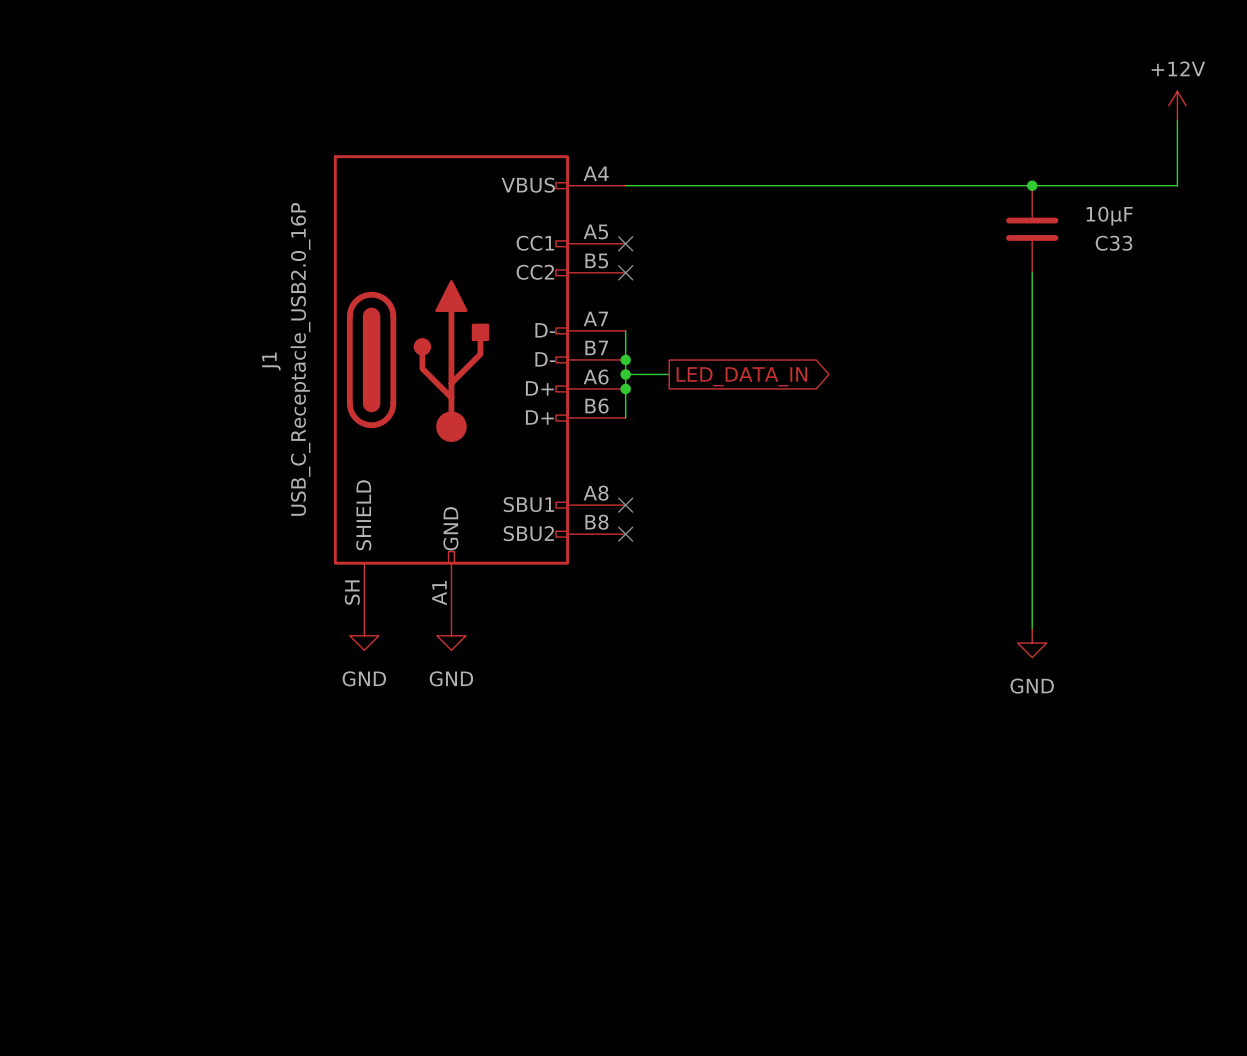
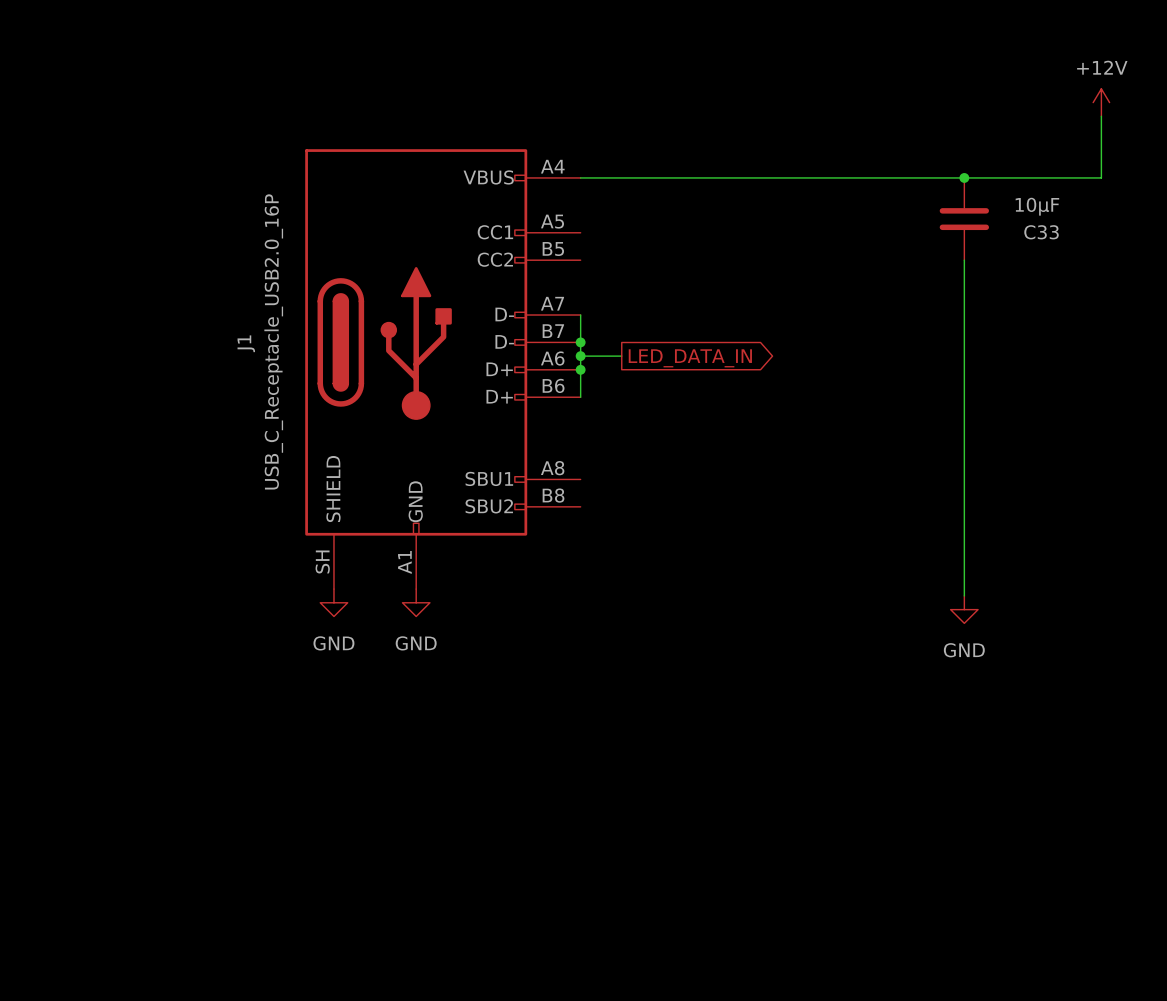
no-connect mark: (625, 243) -> none
no-connect mark: (625, 272) -> none
no-connect mark: (625, 505) -> none
no-connect mark: (625, 534) -> none

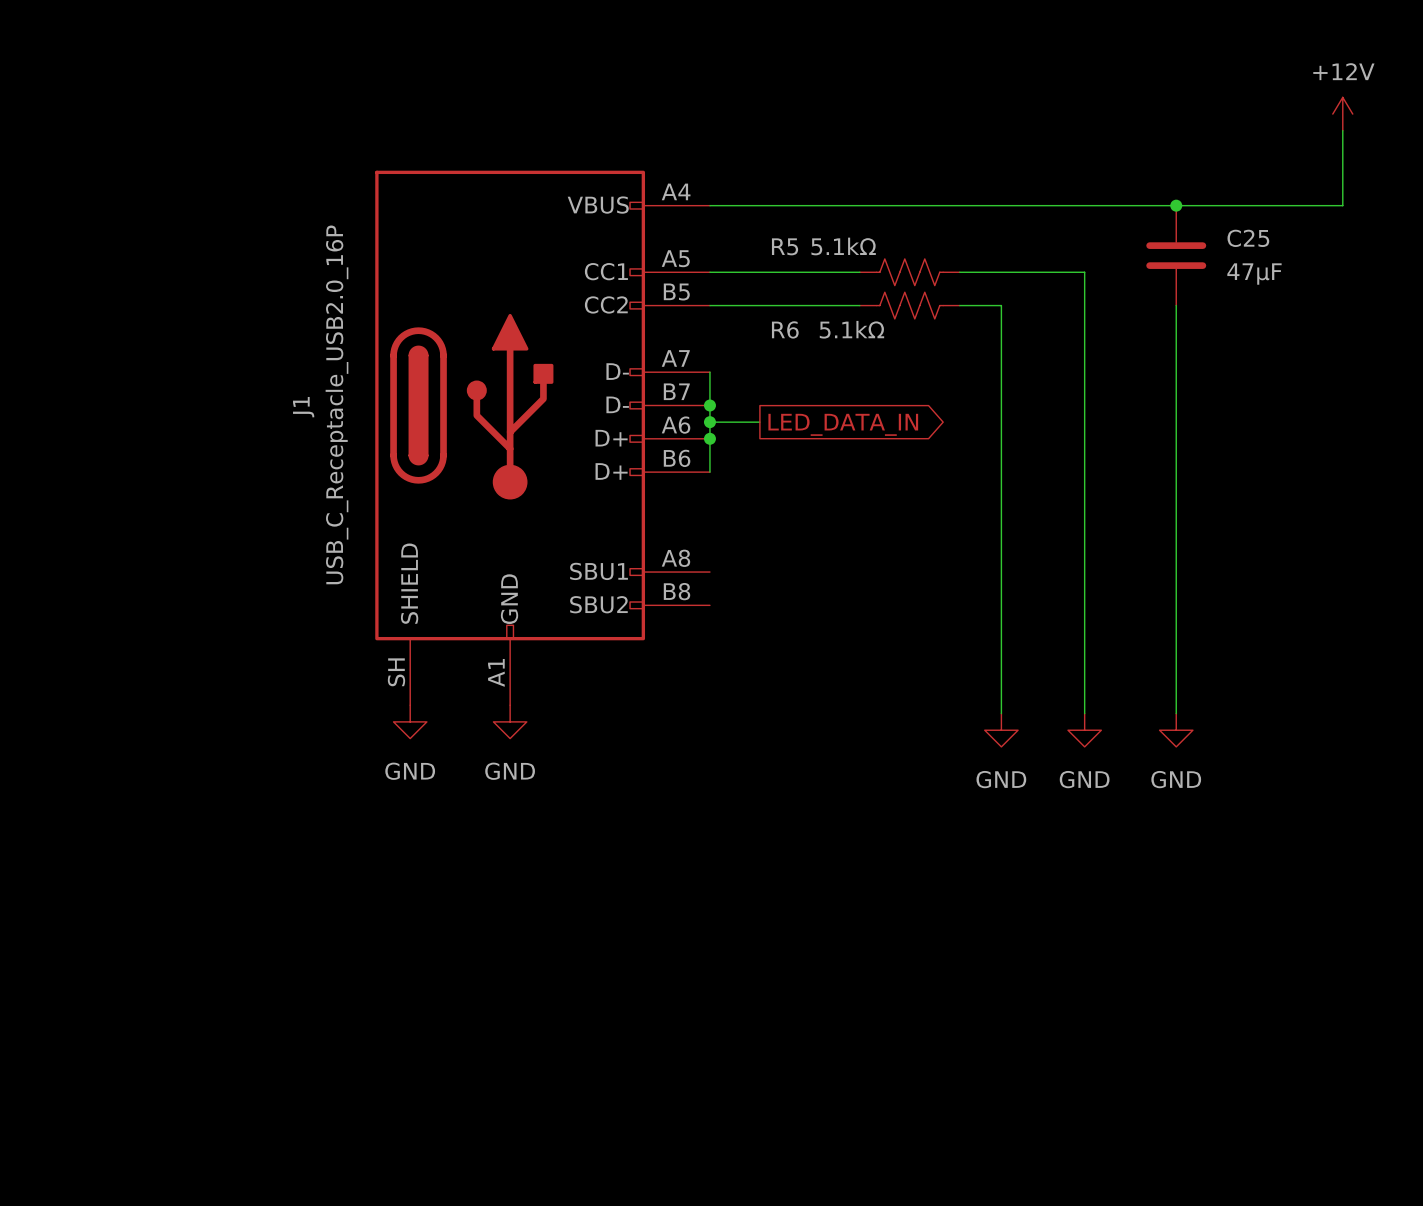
C33 value: 10µF (1037, 206) -> 47µF (1254, 274)
wire: none -> (709, 272) (859, 272)
R5: none -> 5.1kΩ (909, 272)
wire: none -> (959, 272) (1084, 272) (1084, 713)
C33 name: C33 (1041, 232) -> C25 (1248, 238)
wire: none -> (709, 305) (859, 305)
R6: none -> 5.1kΩ (909, 305)
wire: none -> (959, 305) (1001, 305) (1001, 713)
power symbol: none -> GND (1001, 730)
power symbol: none -> GND (1084, 730)

